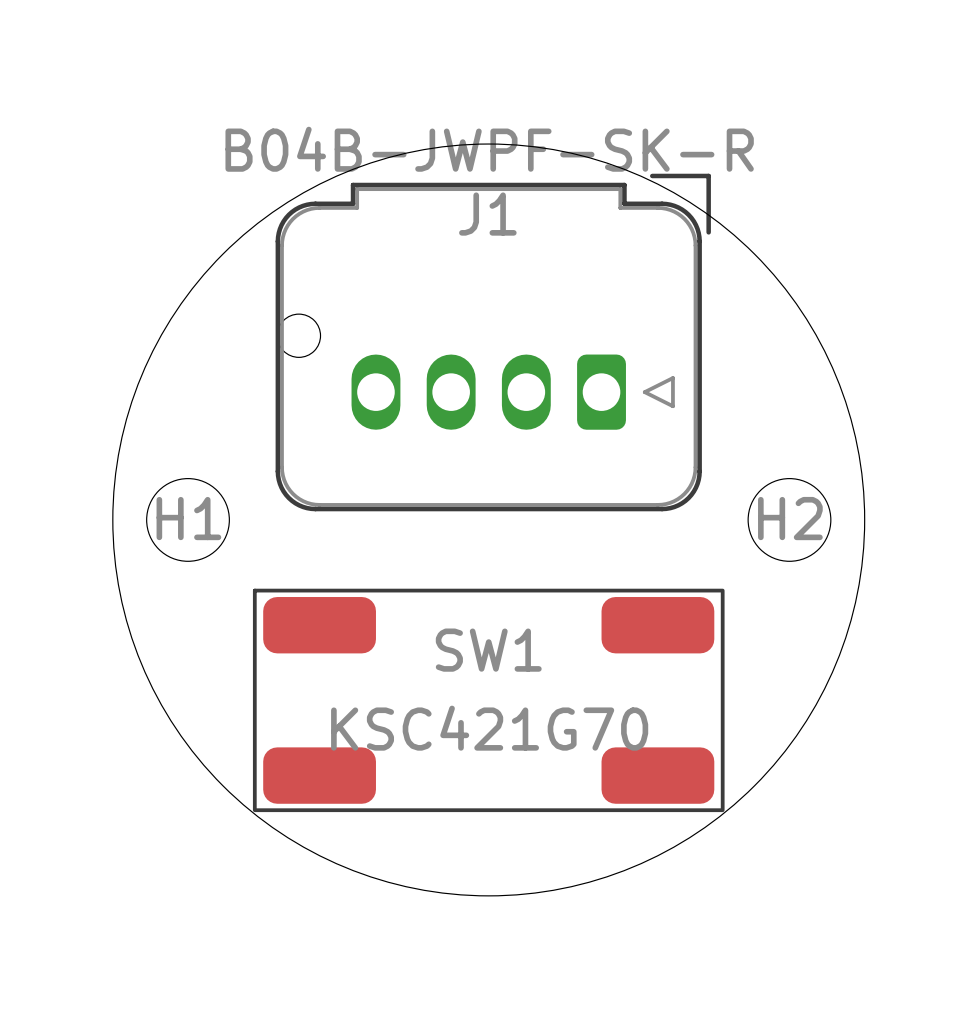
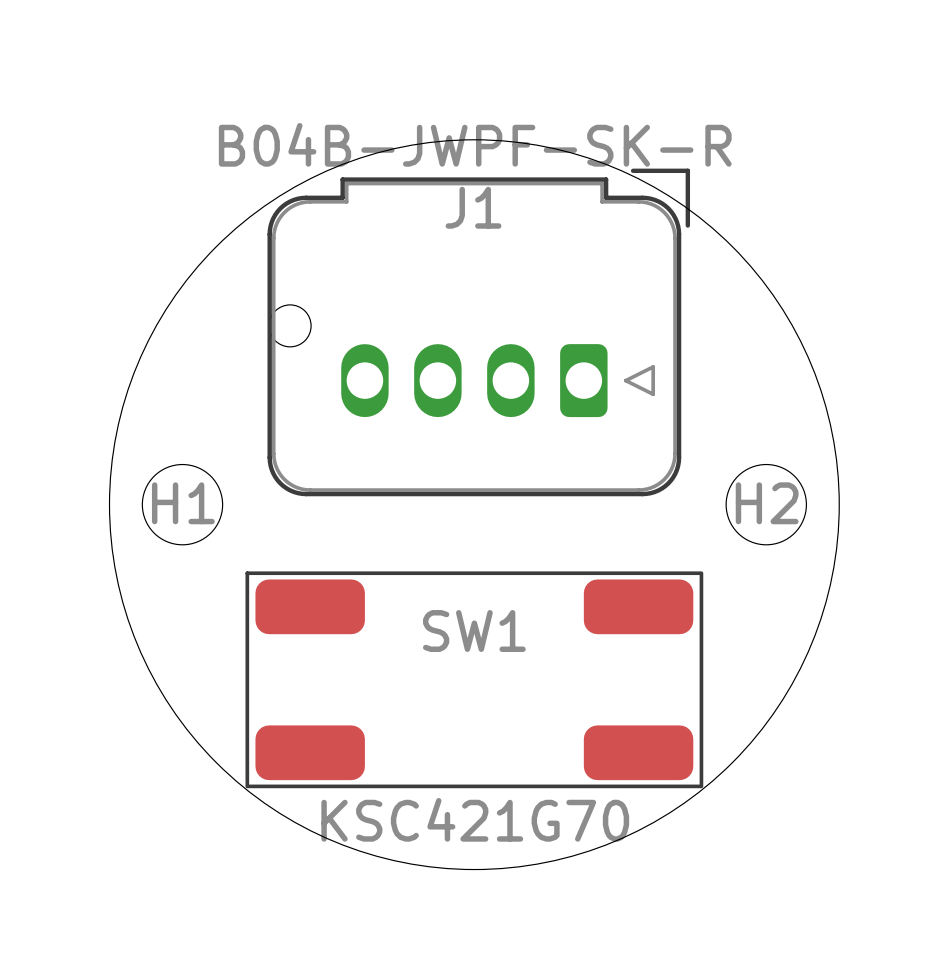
SW1 value position: KSC421G70 (489, 728) -> KSC421G70 (475, 819)

